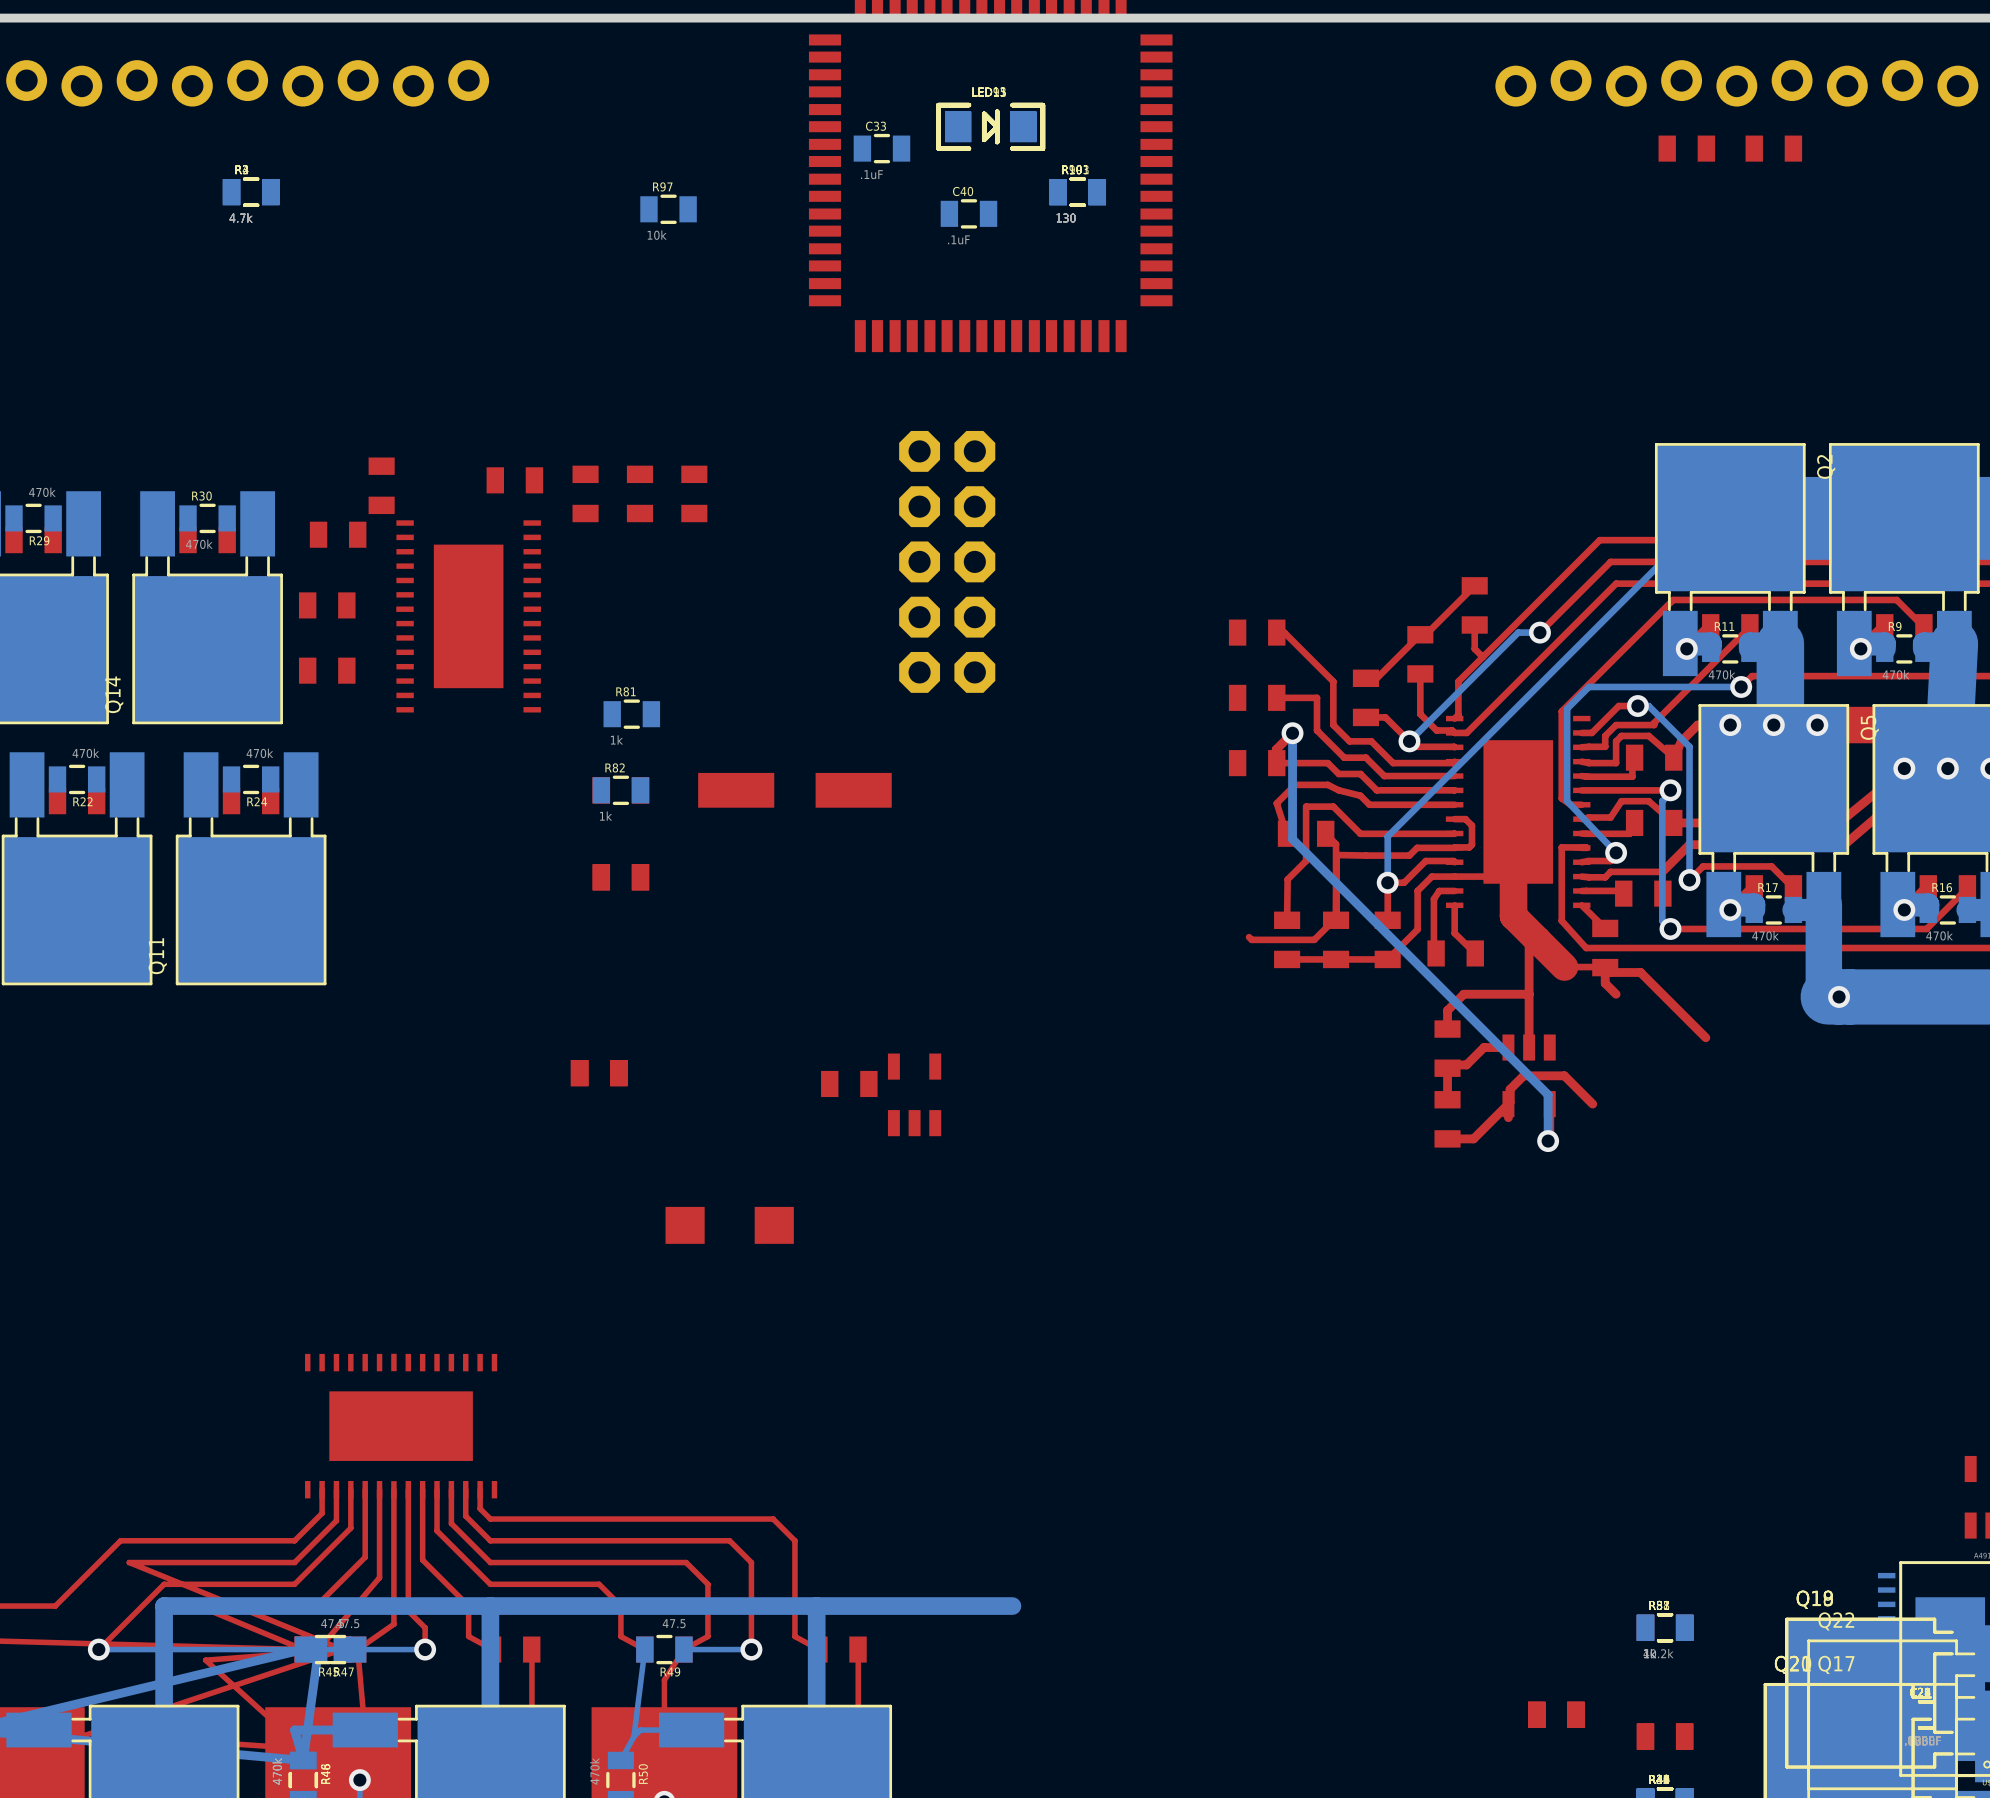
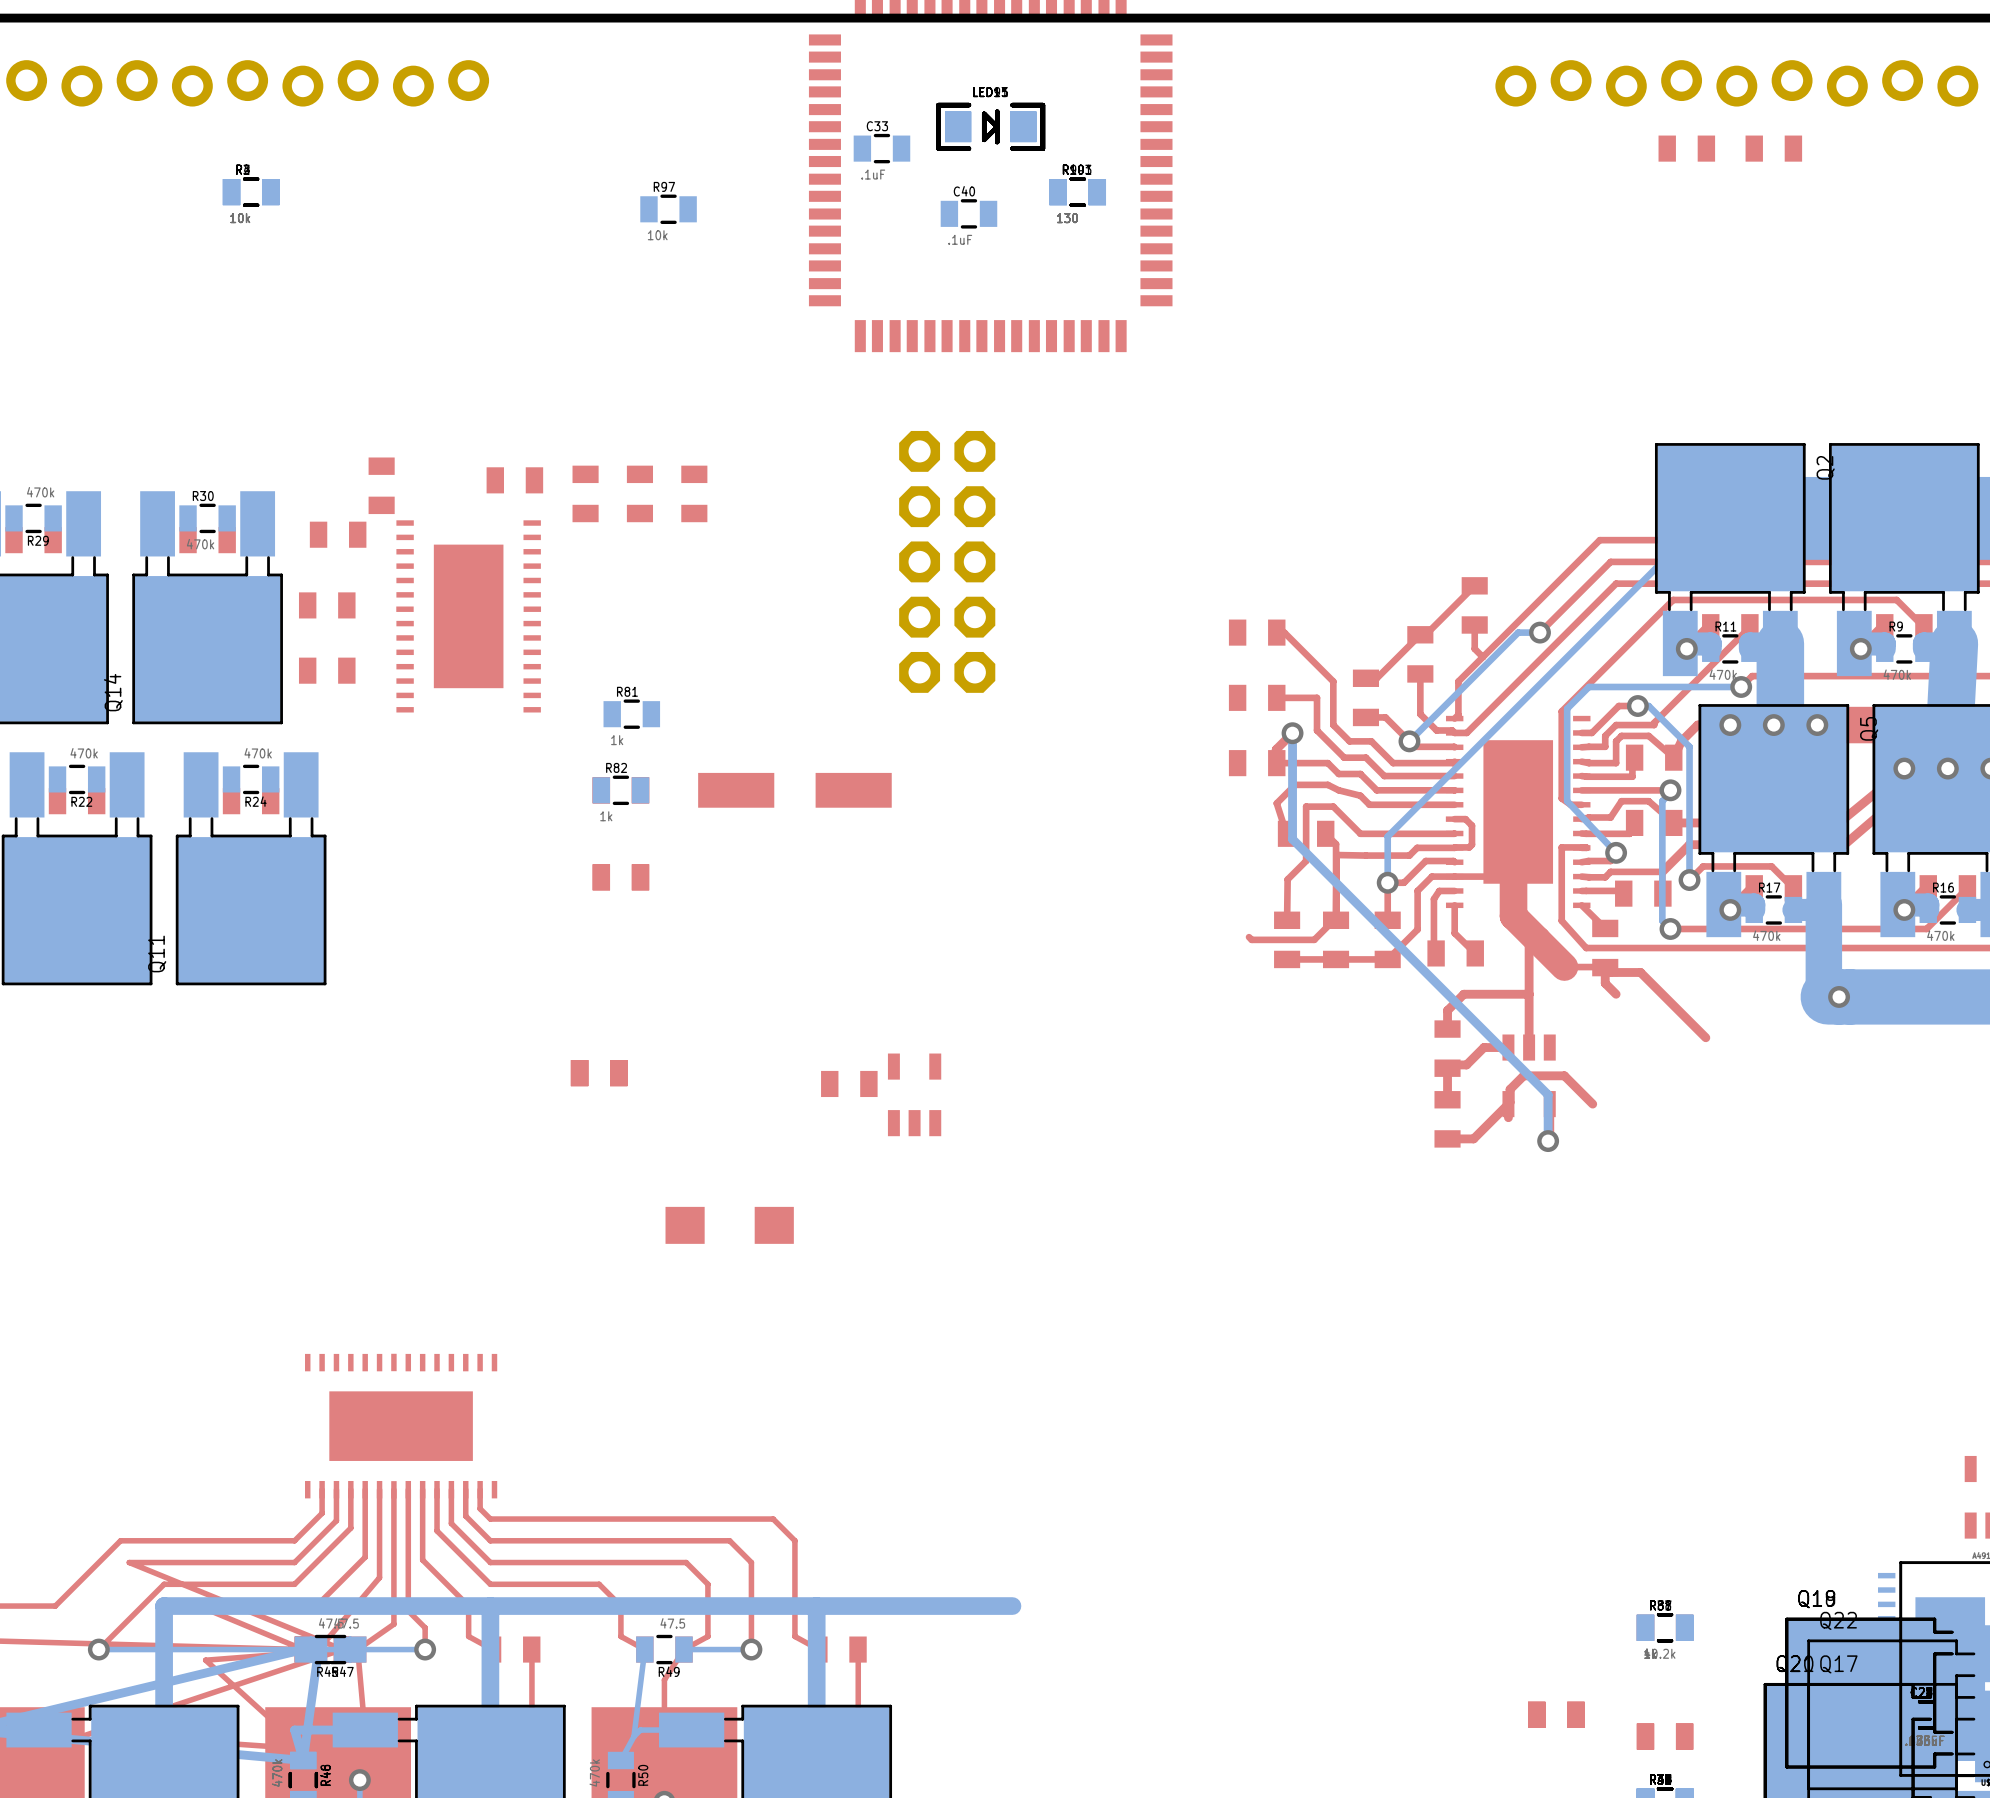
part value: 4.7k (241, 217) -> 10k (240, 218)
part value: 4.7k (241, 217) -> 10k (240, 218)
part value: 4.7k (241, 217) -> 10k (240, 218)

